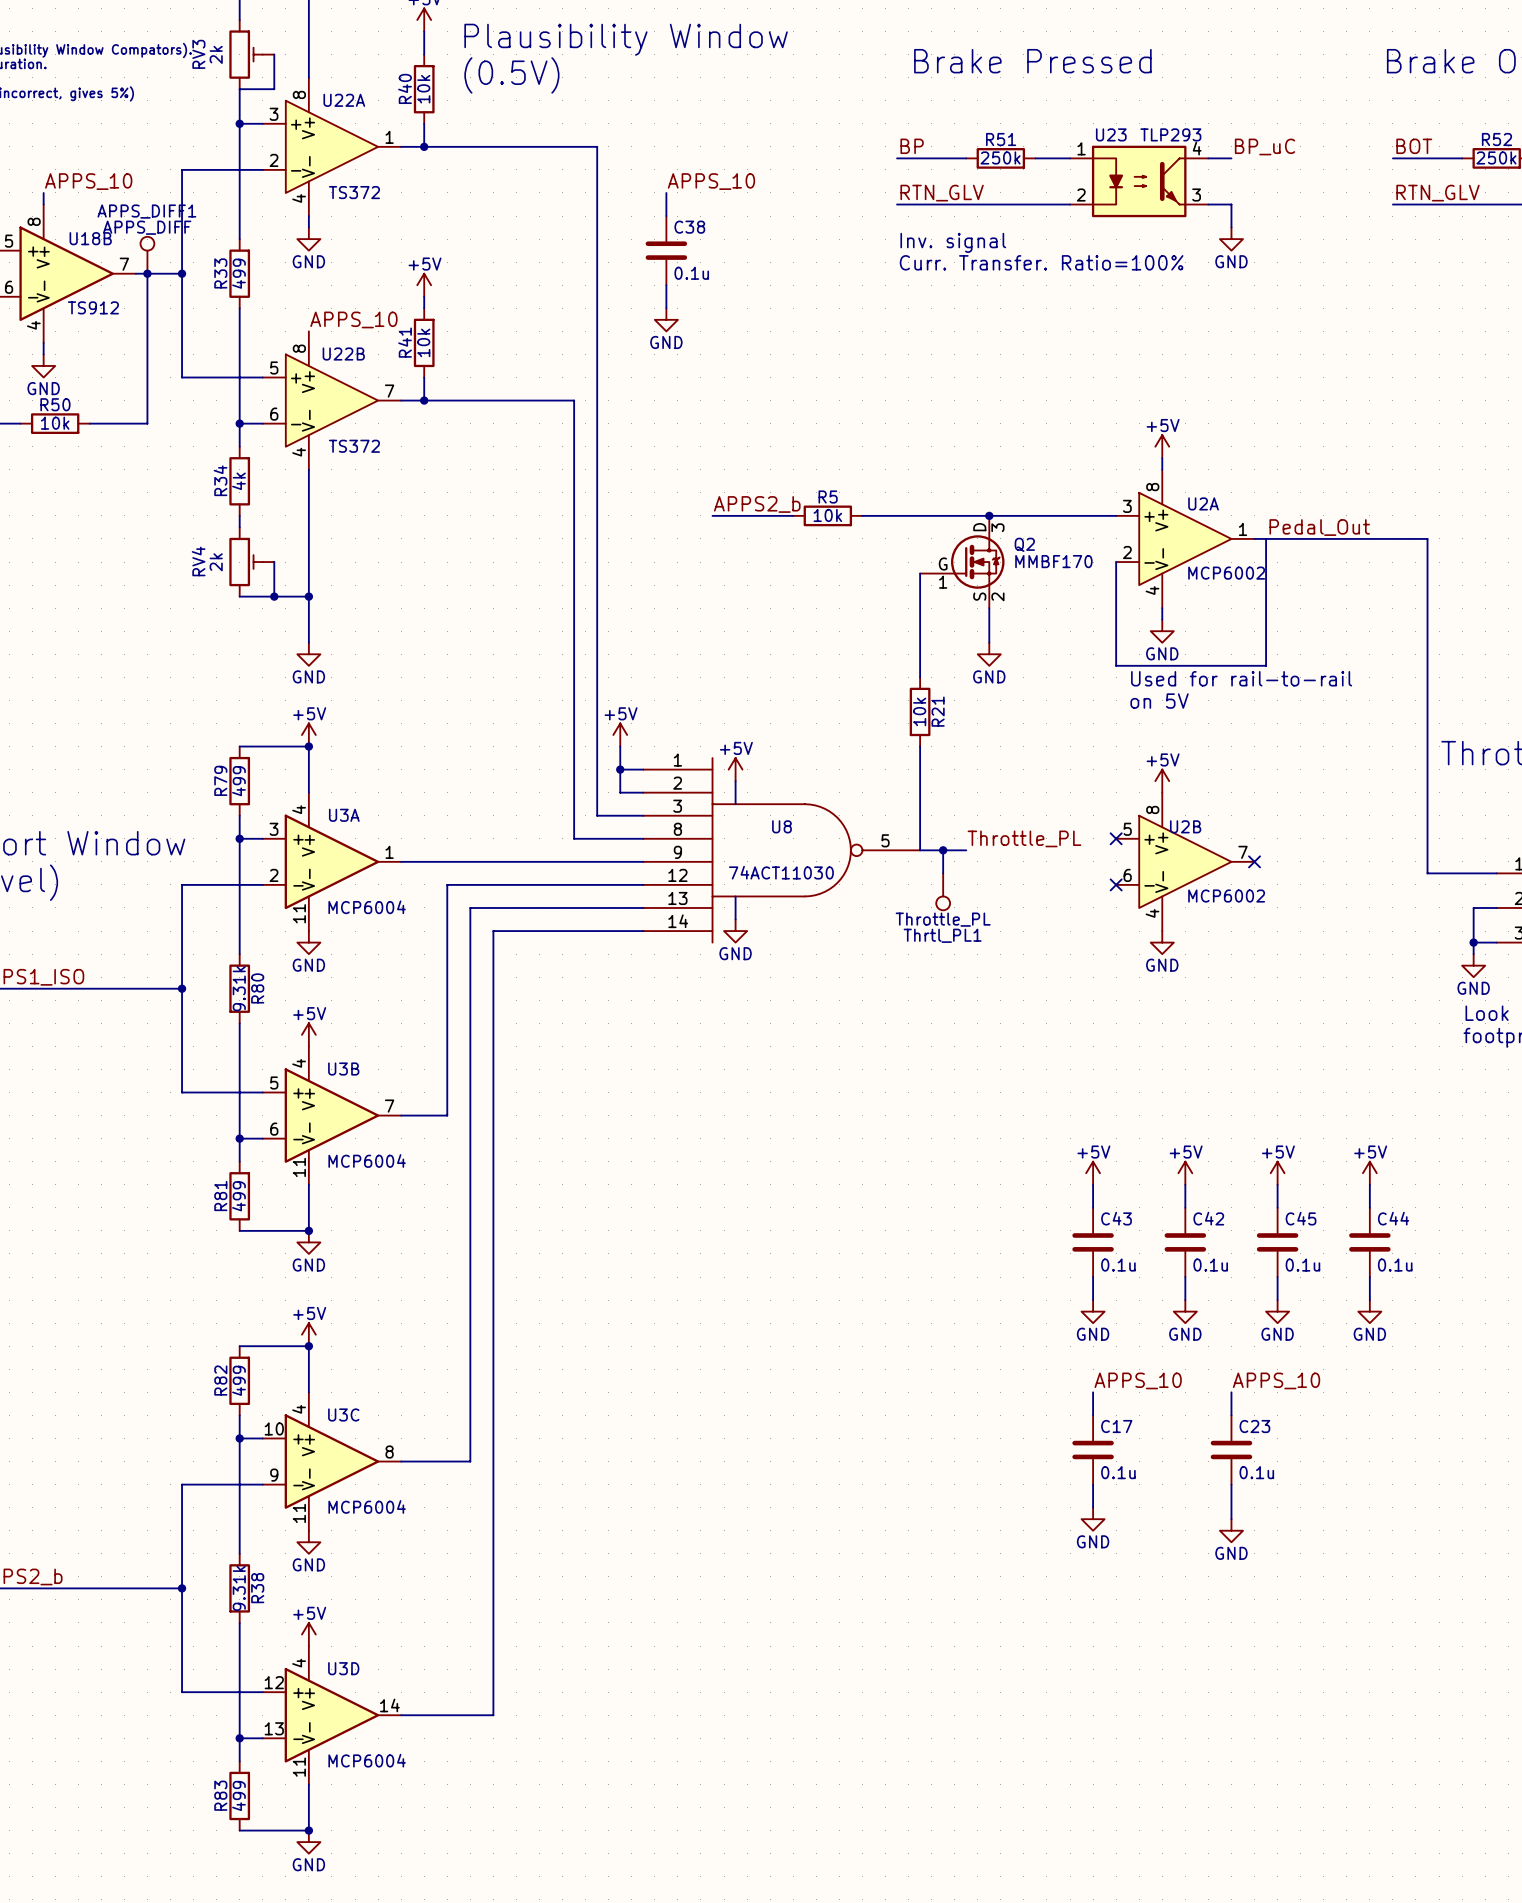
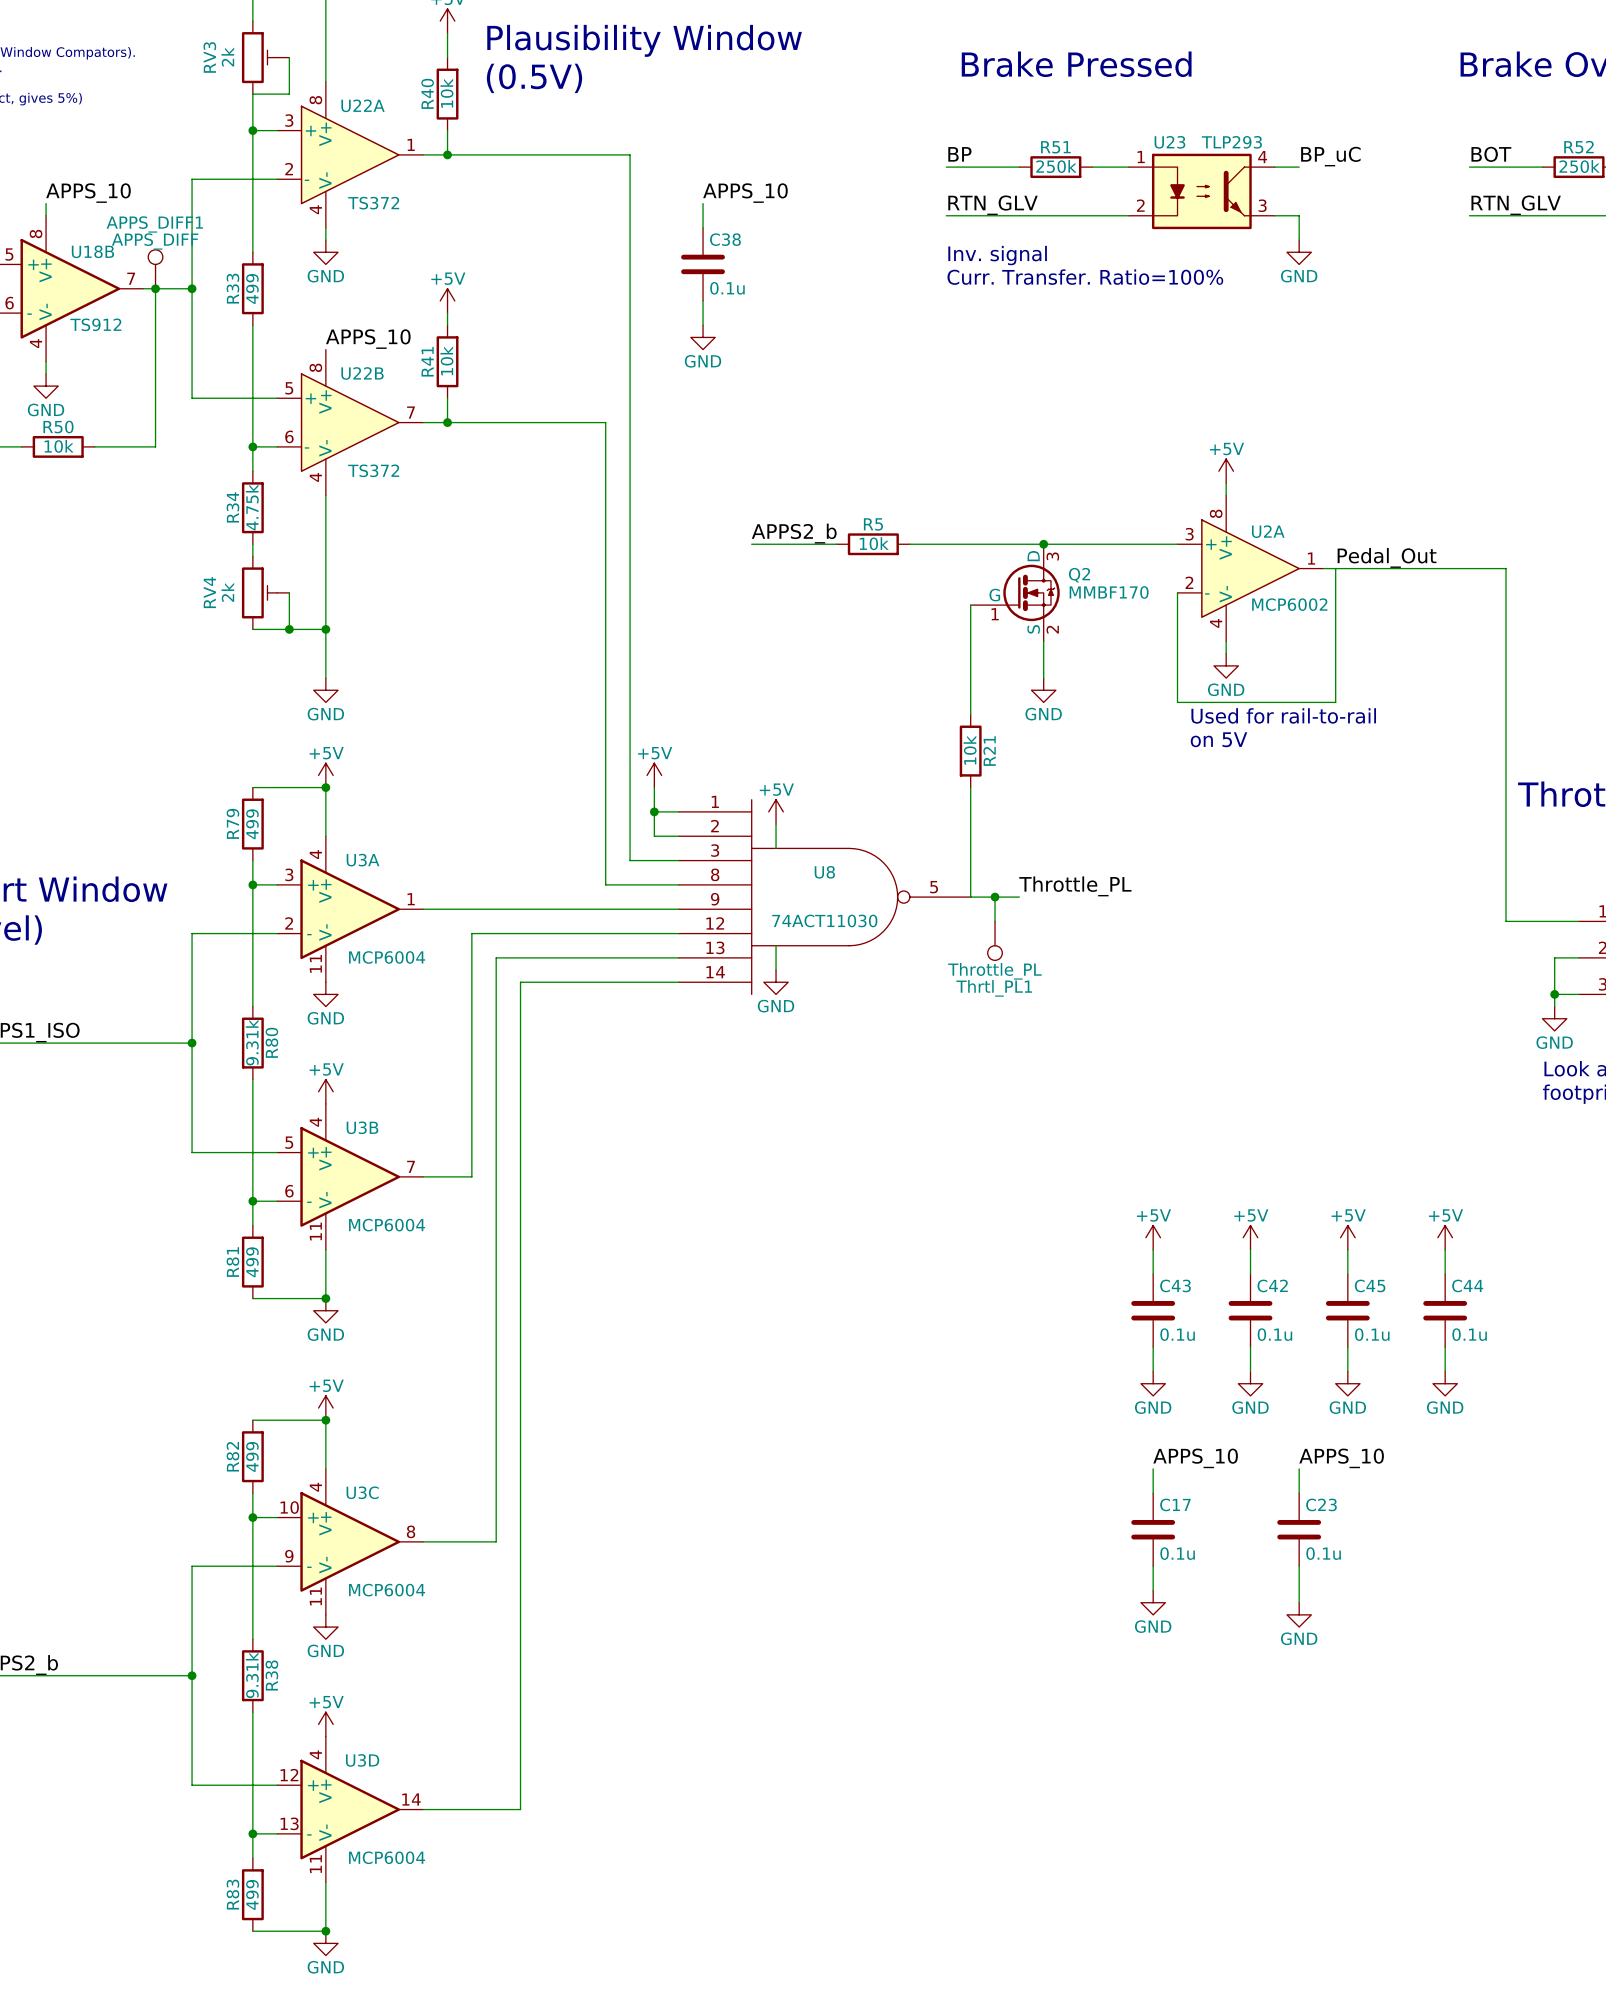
R34 value: 4k (238, 481) -> 4.75k (252, 507)
power symbol: +5V (1162, 781) -> none
no-connect mark: (1116, 838) -> none
U2B: MCP6002 (1185, 861) -> none
no-connect mark: (1254, 861) -> none
no-connect mark: (1116, 884) -> none
power symbol: GND (1162, 942) -> none

